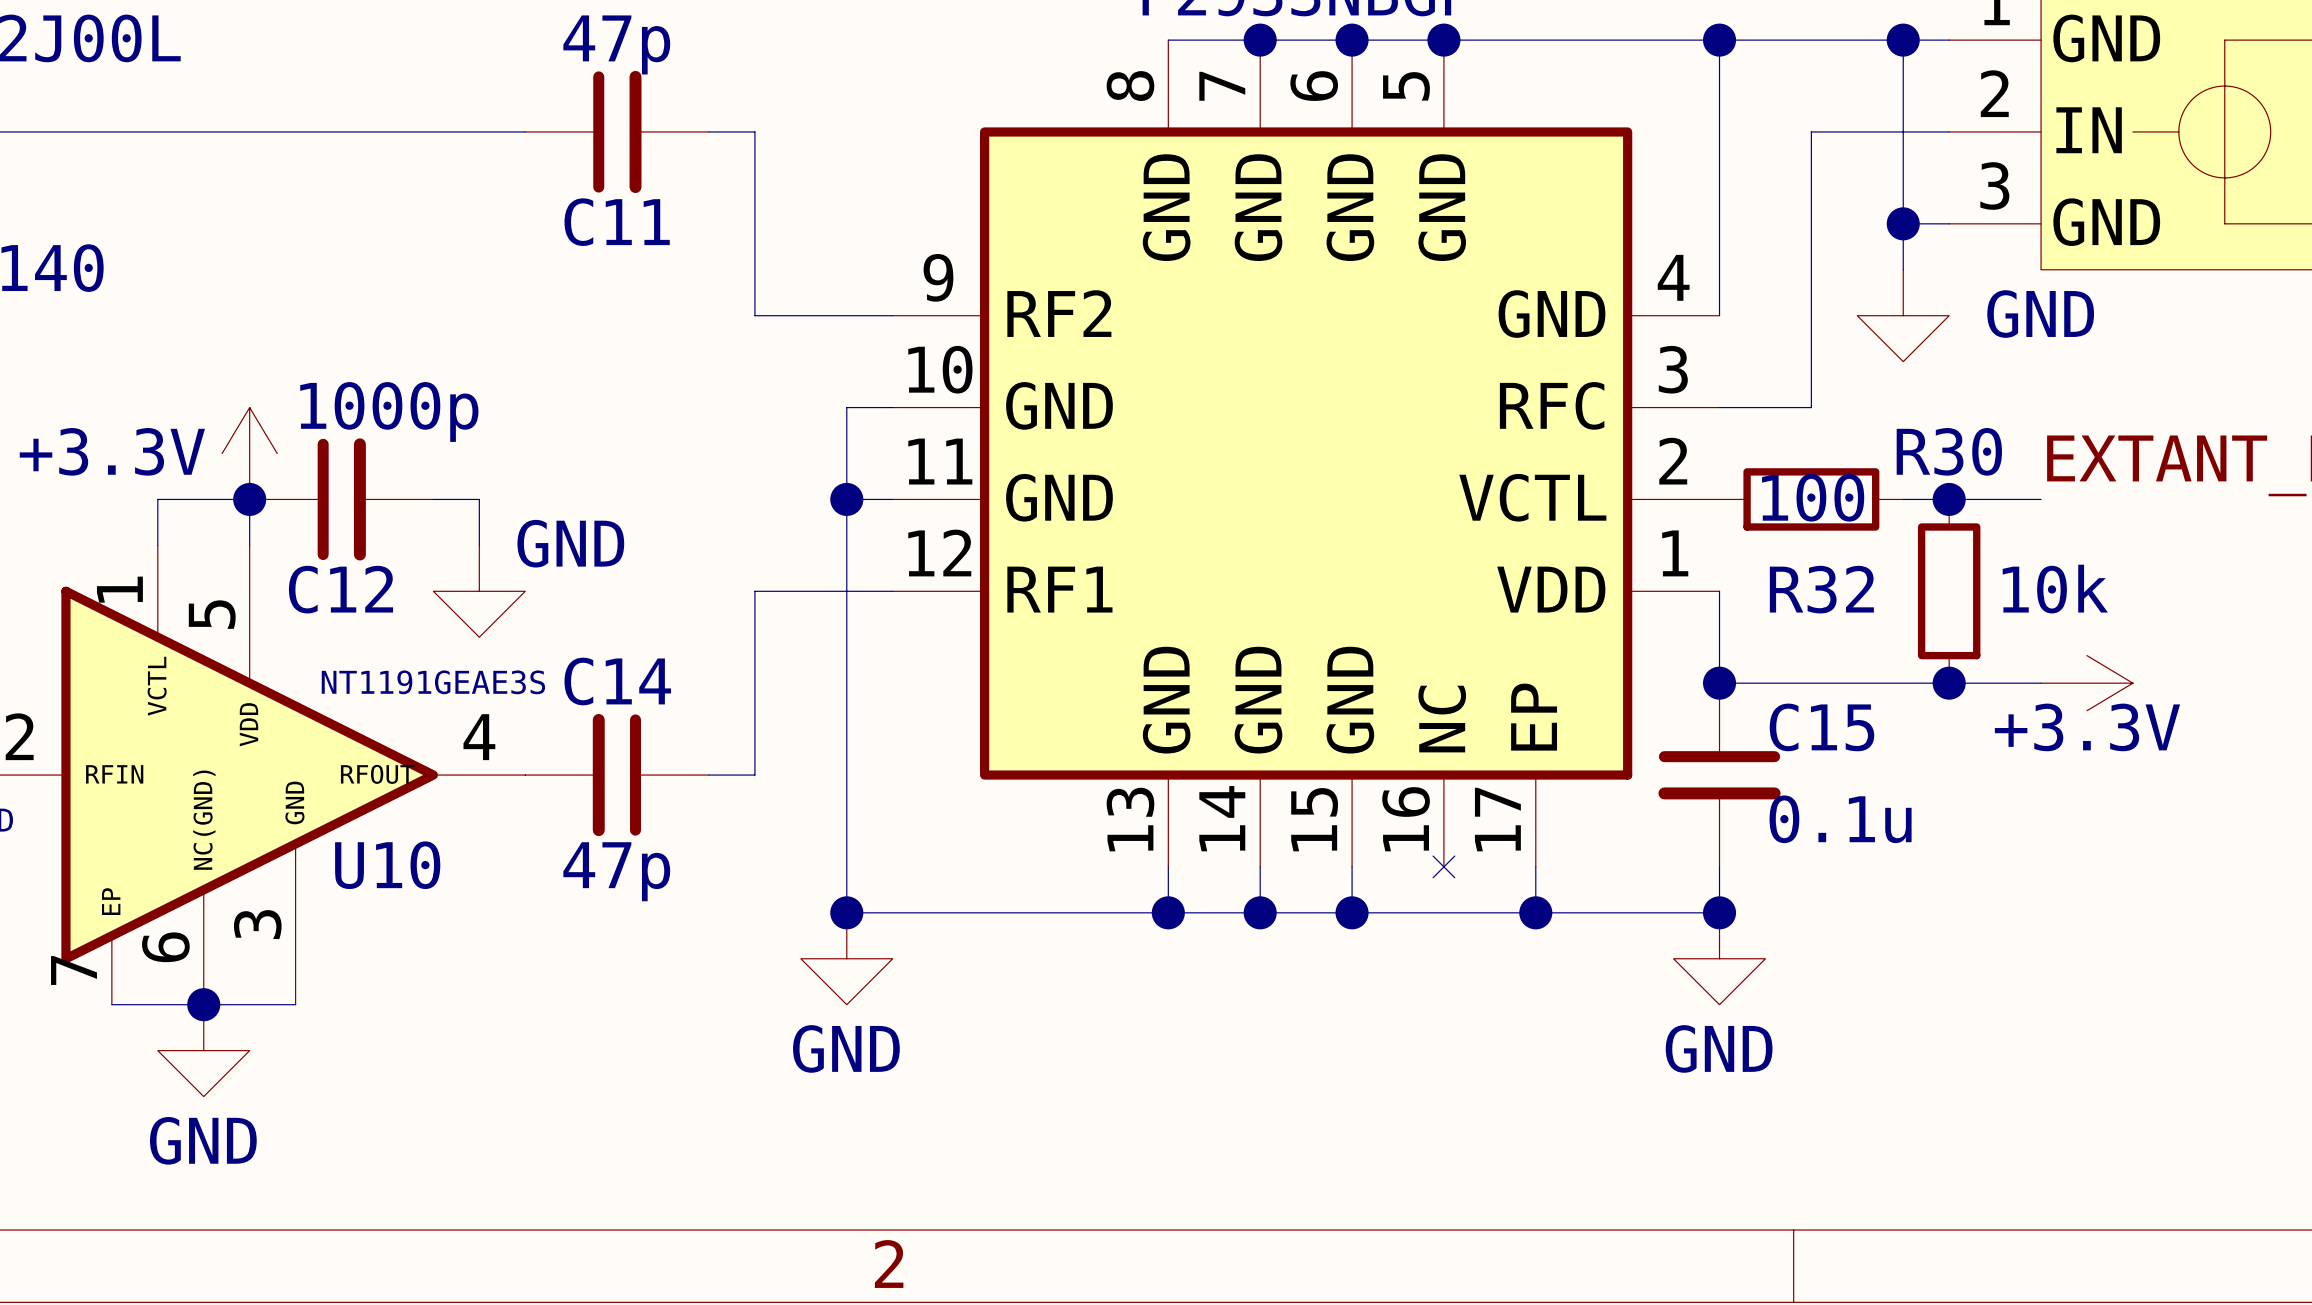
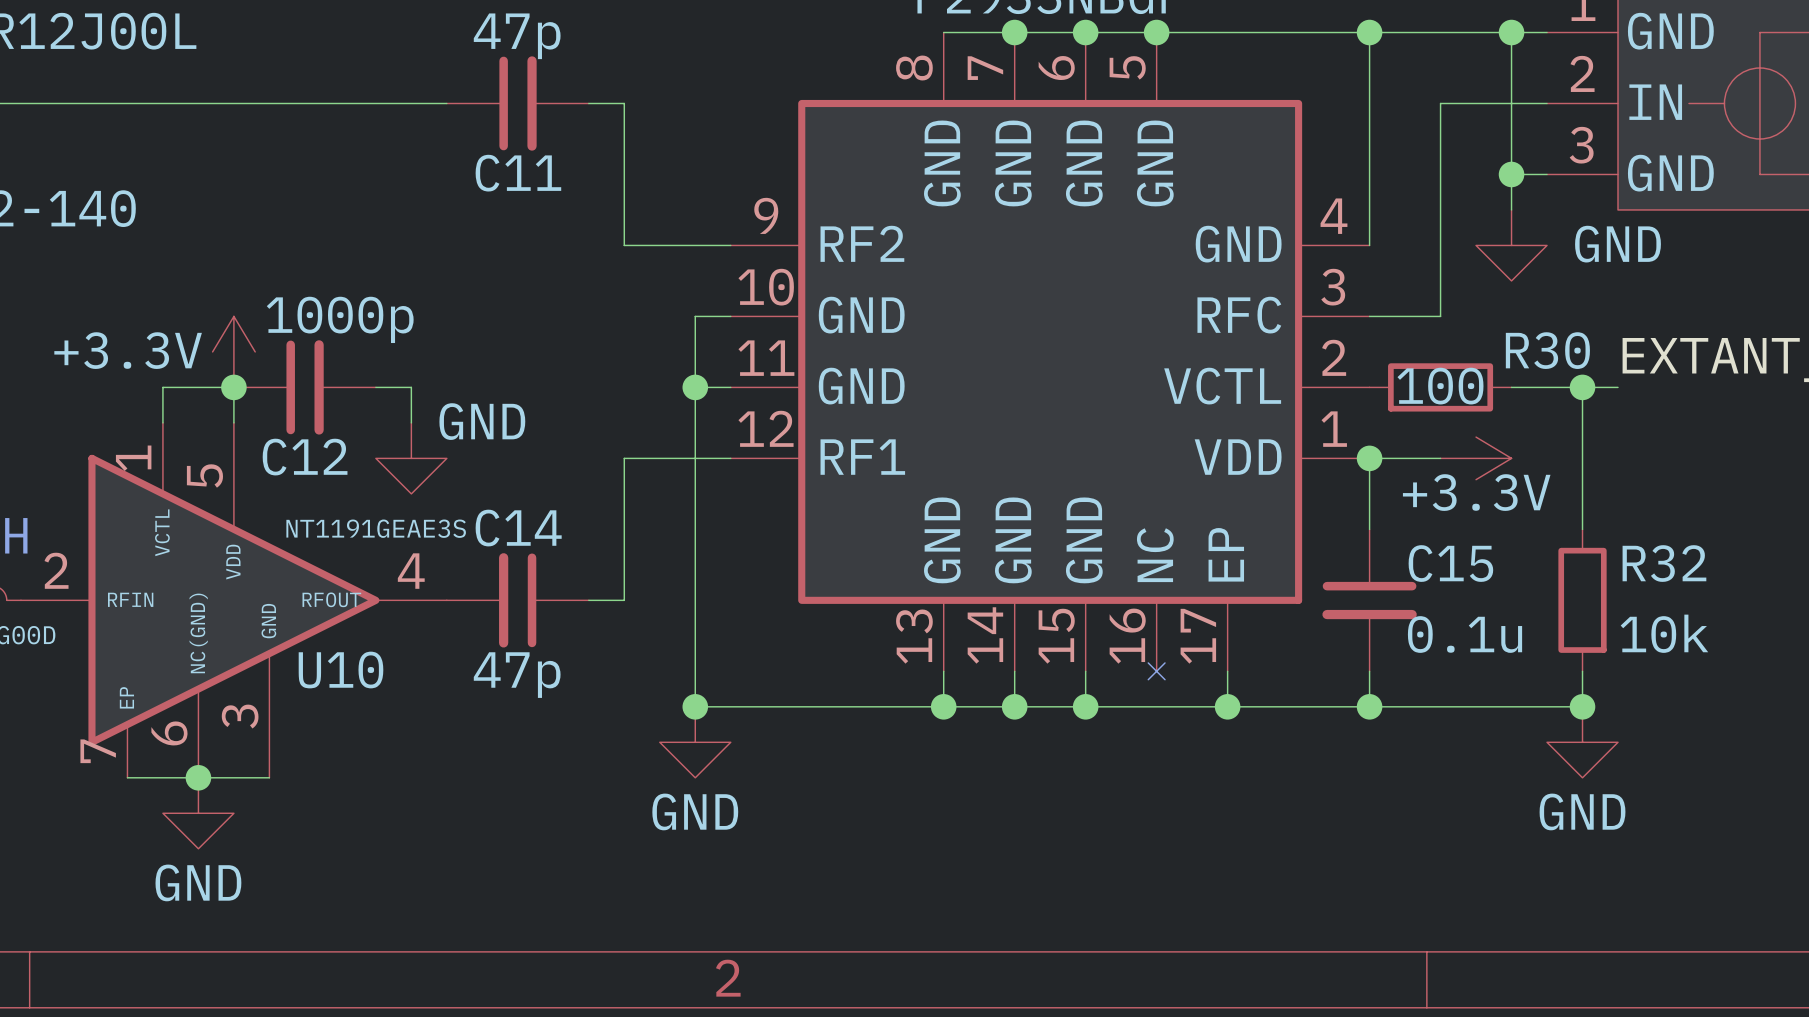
junction position: (1949, 499) -> (1582, 387)
wire: none -> (1582, 387) (1582, 529)
R32 name position: R32 (1821, 589) -> R32 (1664, 563)
R32 value position: 10k (2055, 589) -> 10k (1664, 633)
wire: none -> (1369, 458) (1440, 458)
R32 position: (1949, 591) -> (1582, 600)
wire: (1719, 683) (2041, 683) -> none
junction position: (1719, 683) -> (1369, 458)
junction: (1949, 683) -> none
power symbol position: +3.3V (2086, 683) -> +3.3V (1476, 458)
wire: none -> (1582, 671) (1582, 706) (1369, 706)
junction: none -> (1582, 706)
power symbol position: GND (1719, 958) -> GND (1582, 742)

